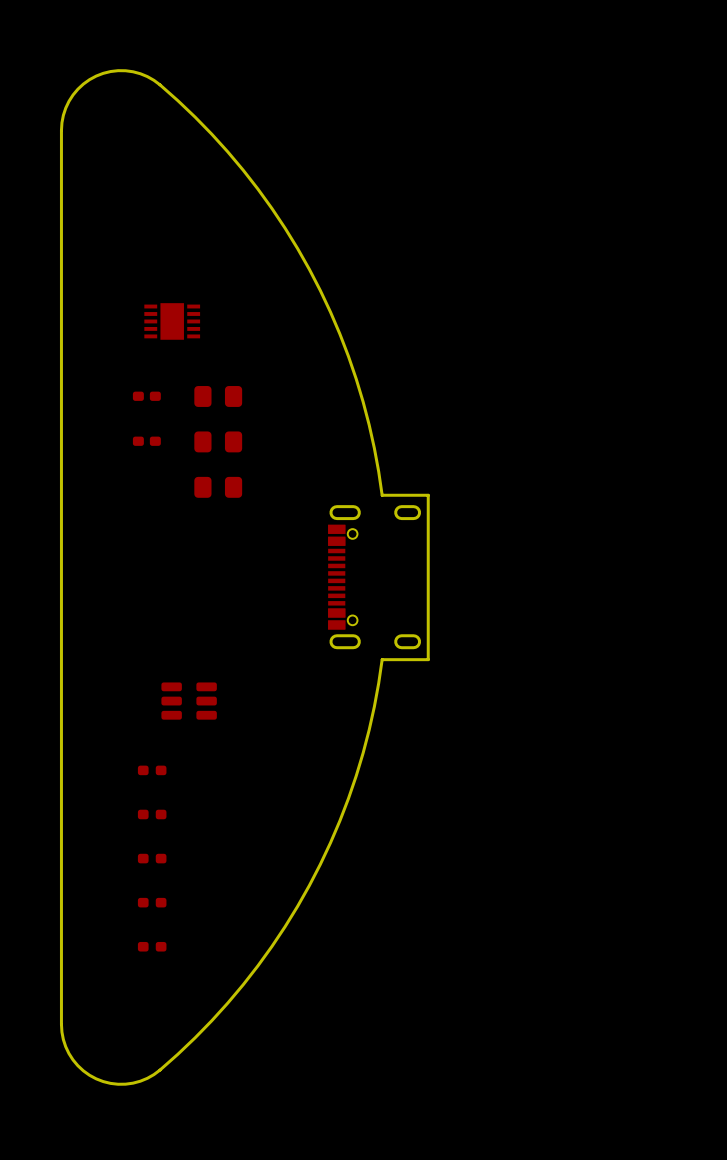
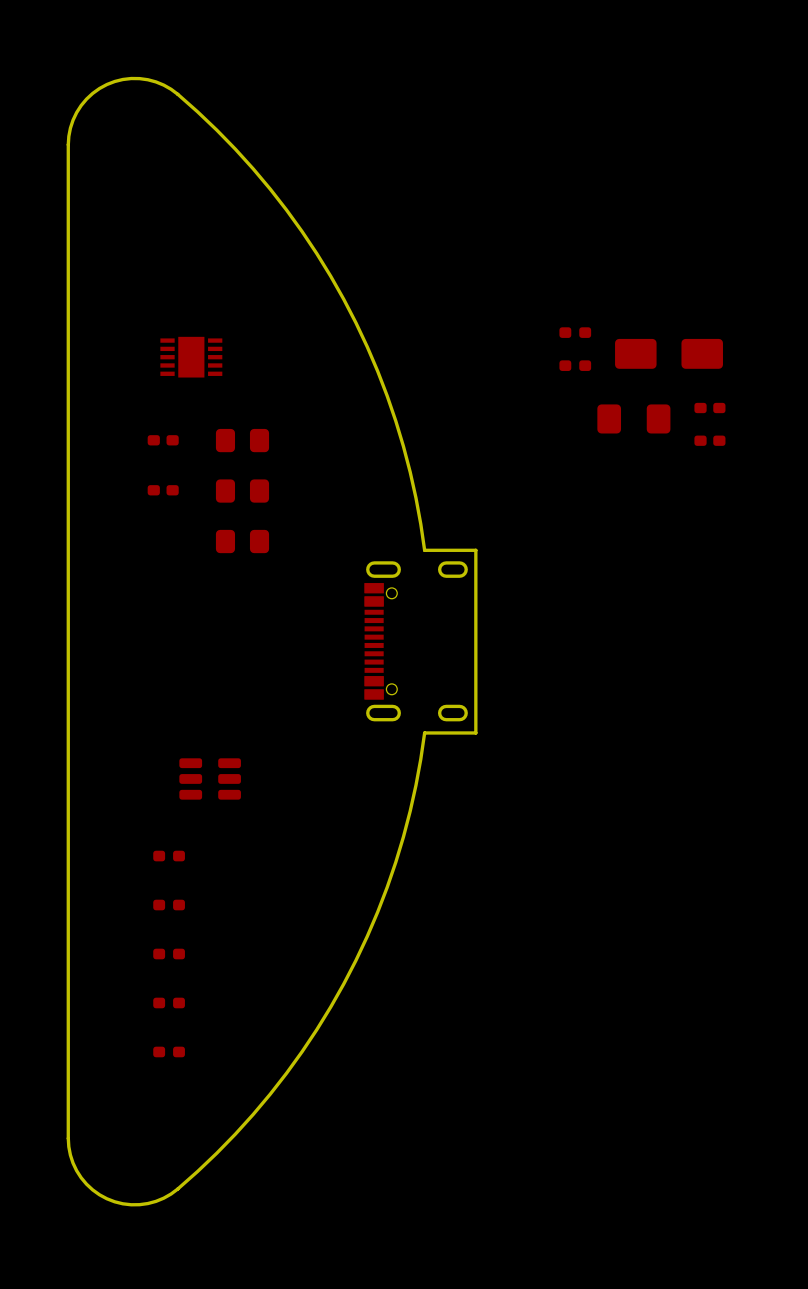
part: none -> (575, 332)
part: none -> (669, 353)
part: none -> (575, 365)
part: none -> (709, 408)
part: none -> (633, 418)
part: none -> (709, 440)

